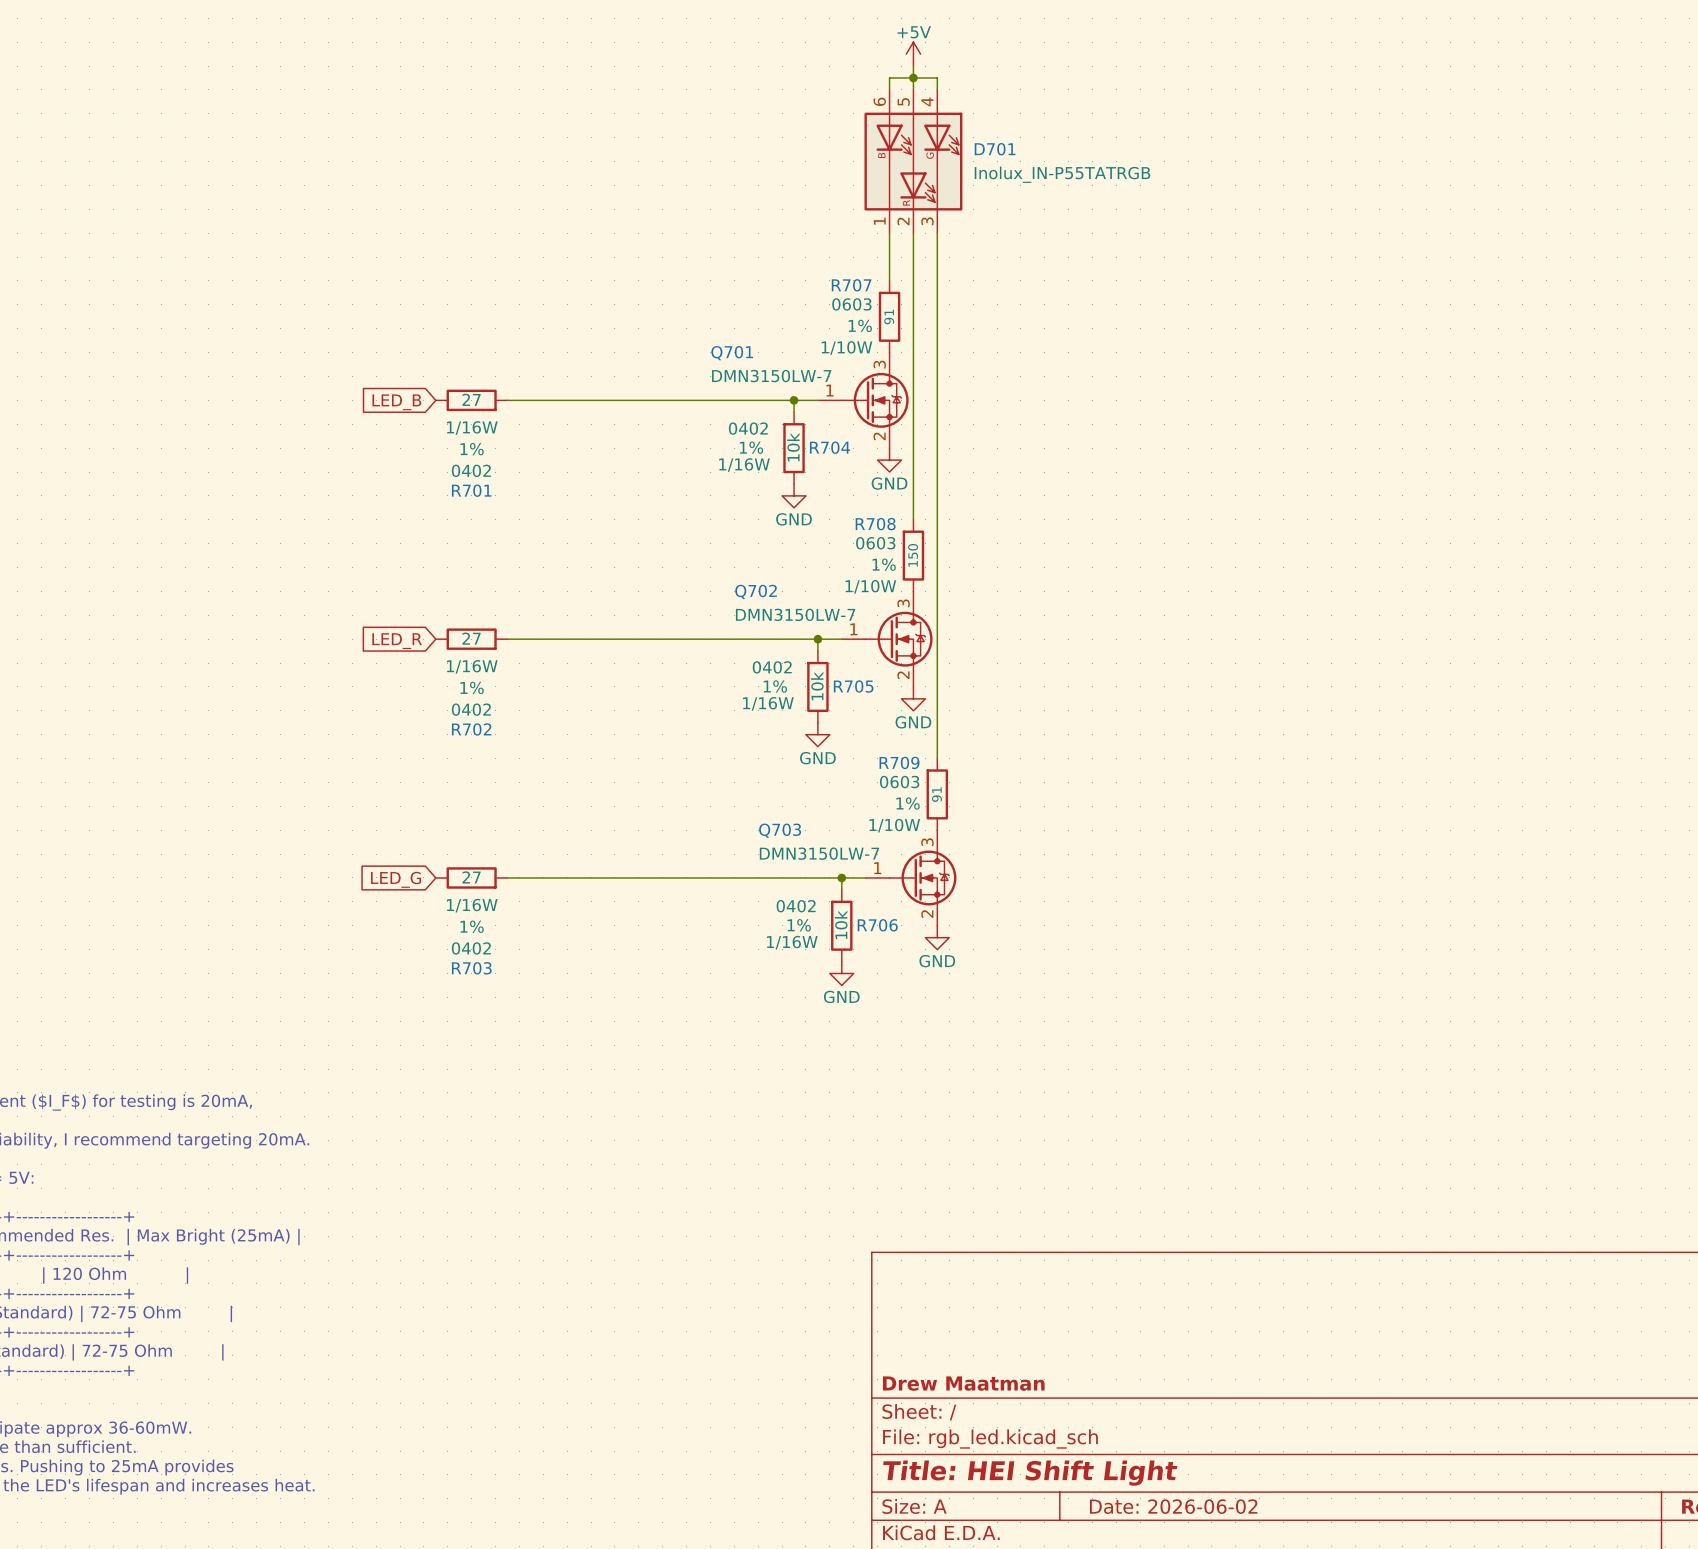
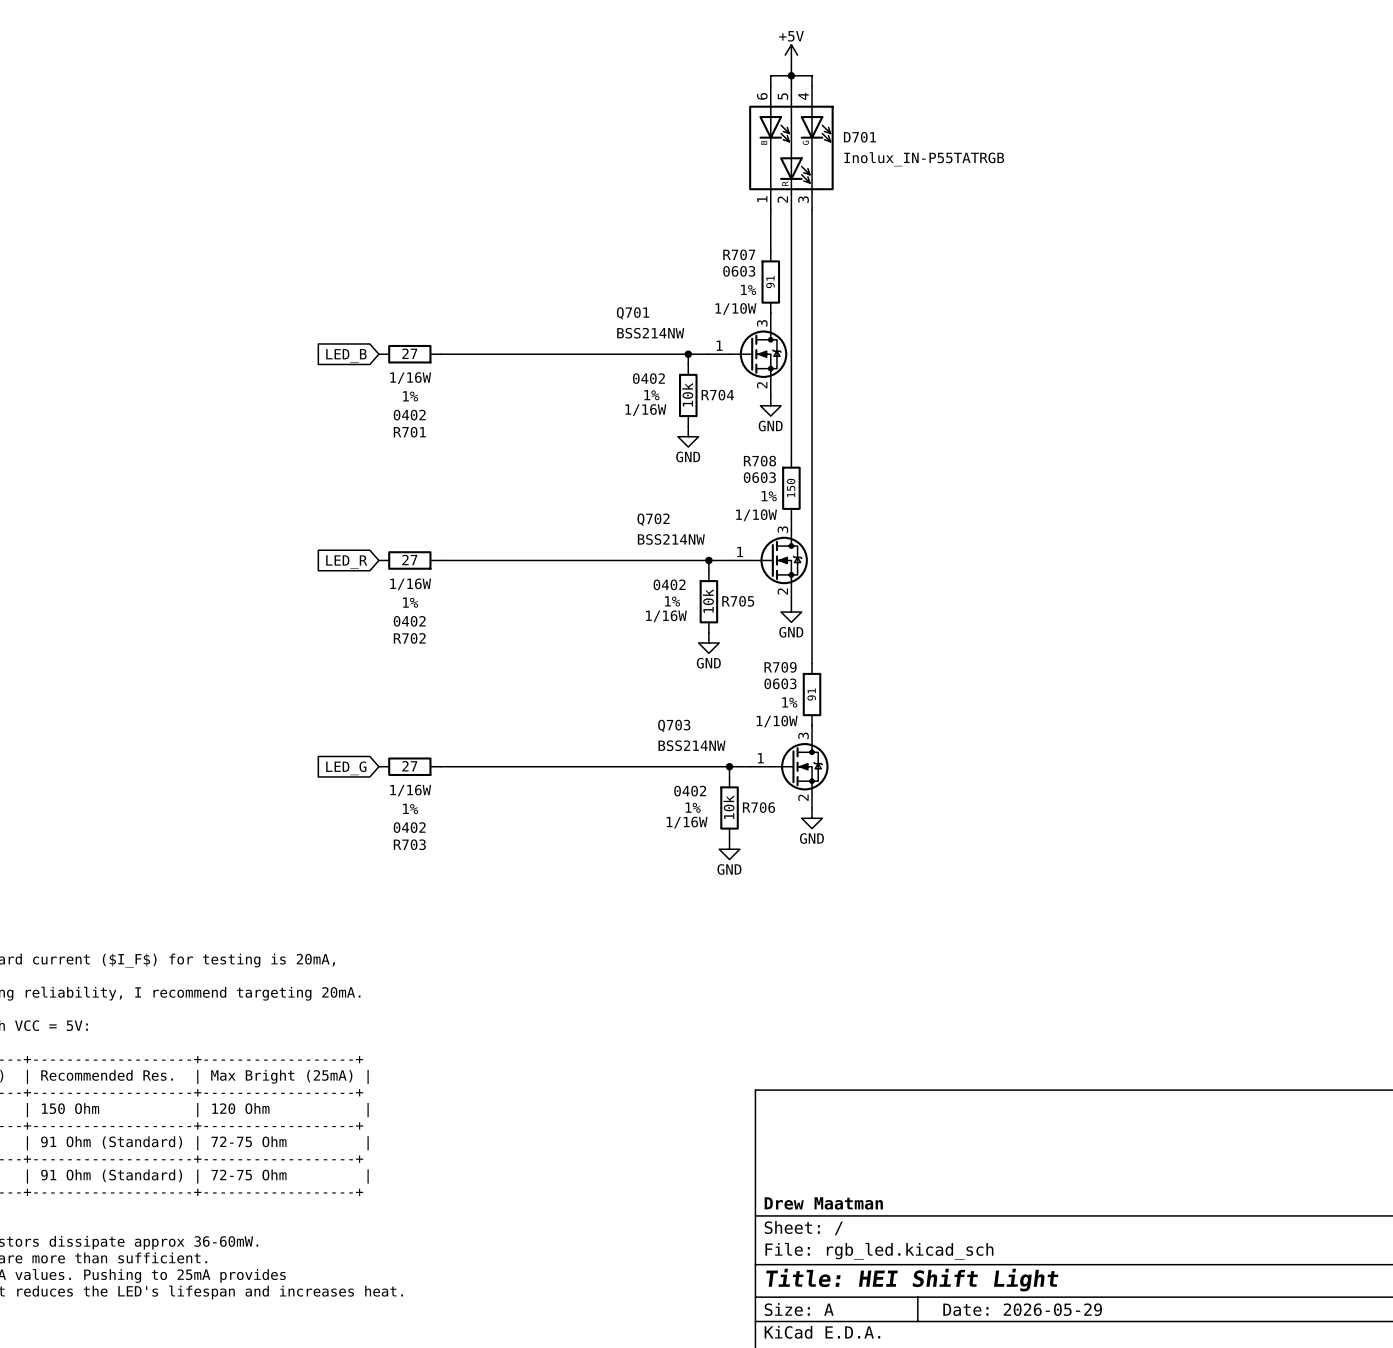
Q701 value: DMN3150LW-7 (771, 376) -> BSS214NW (650, 333)
Q702 value: DMN3150LW-7 (795, 614) -> BSS214NW (671, 539)
Q703 value: DMN3150LW-7 (819, 853) -> BSS214NW (691, 745)
title block: Date: 2026-06-02 (1173, 1506) -> Date: 2026-05-29 (1022, 1309)

